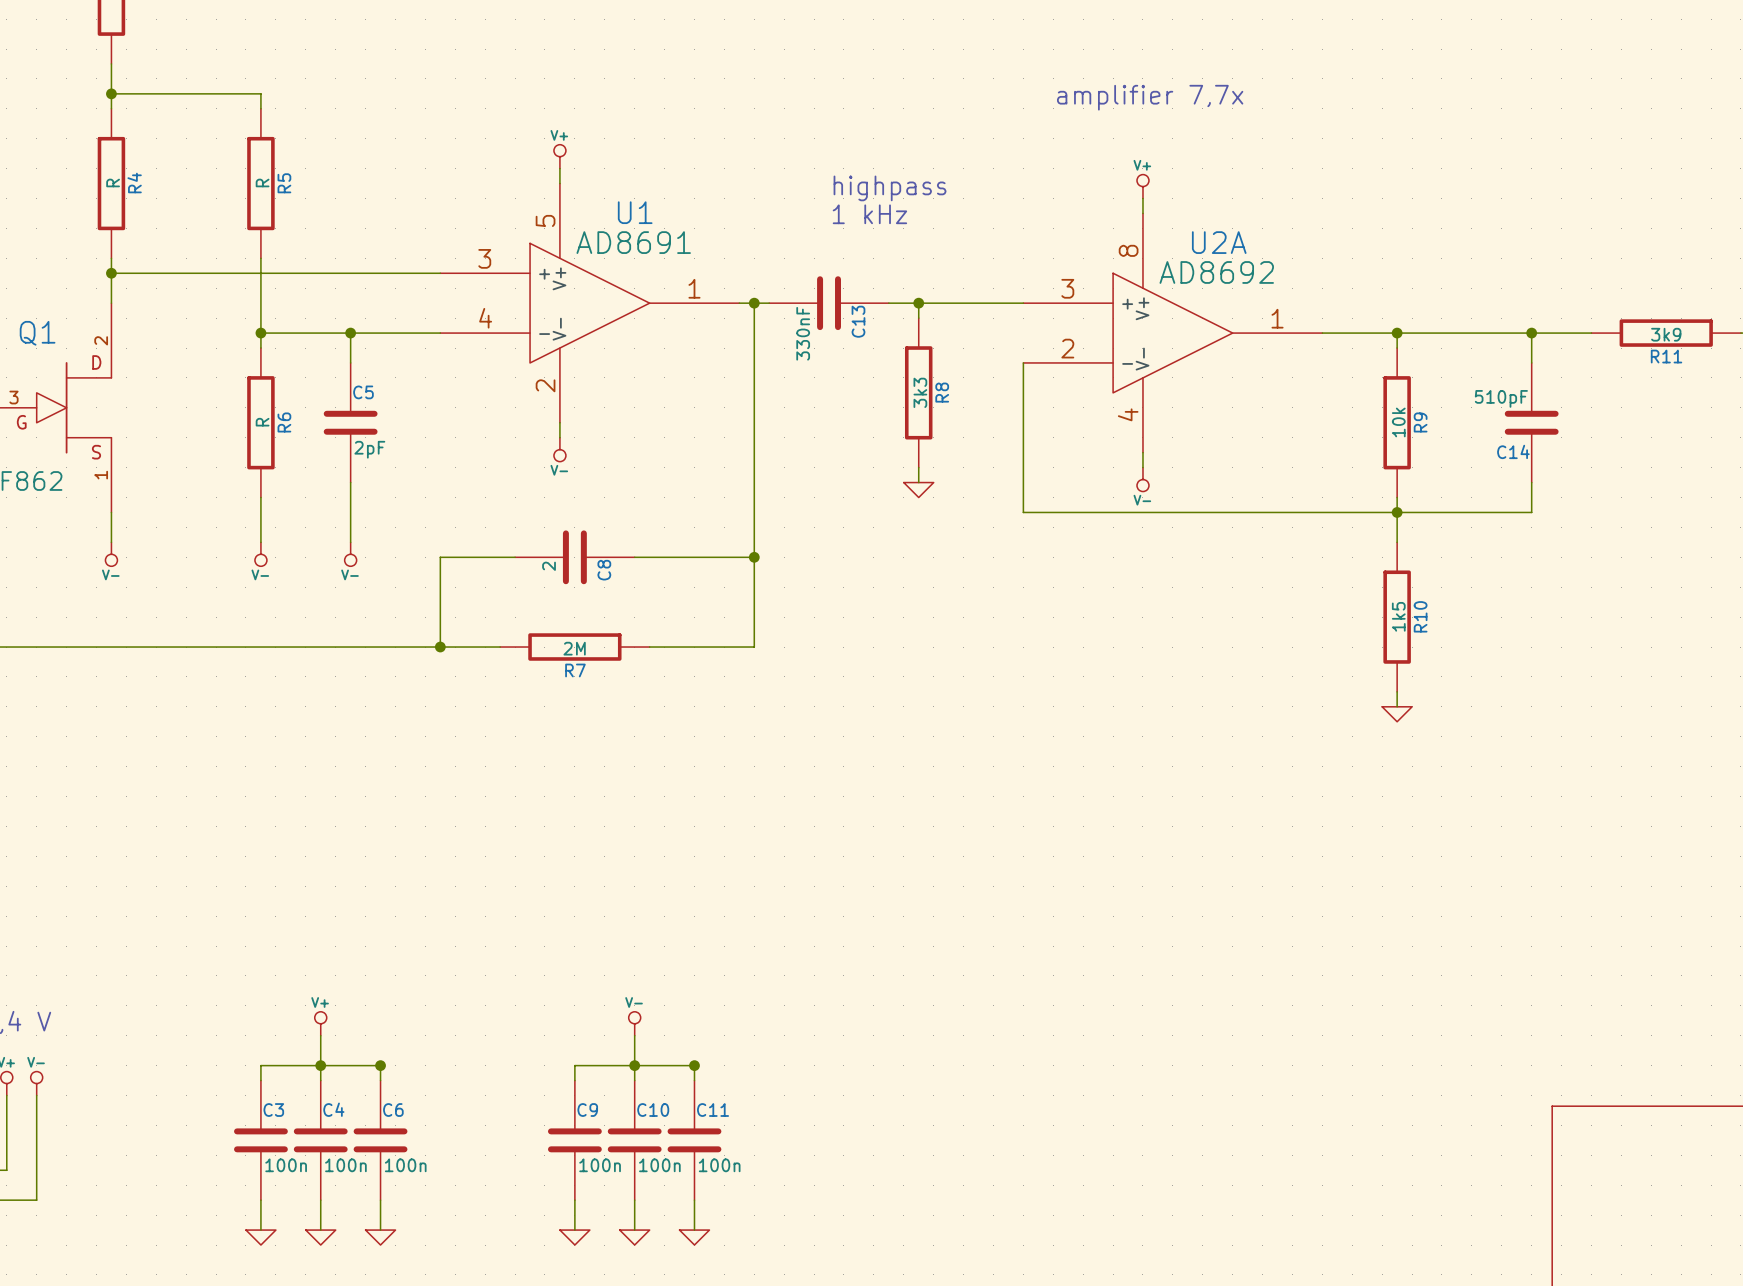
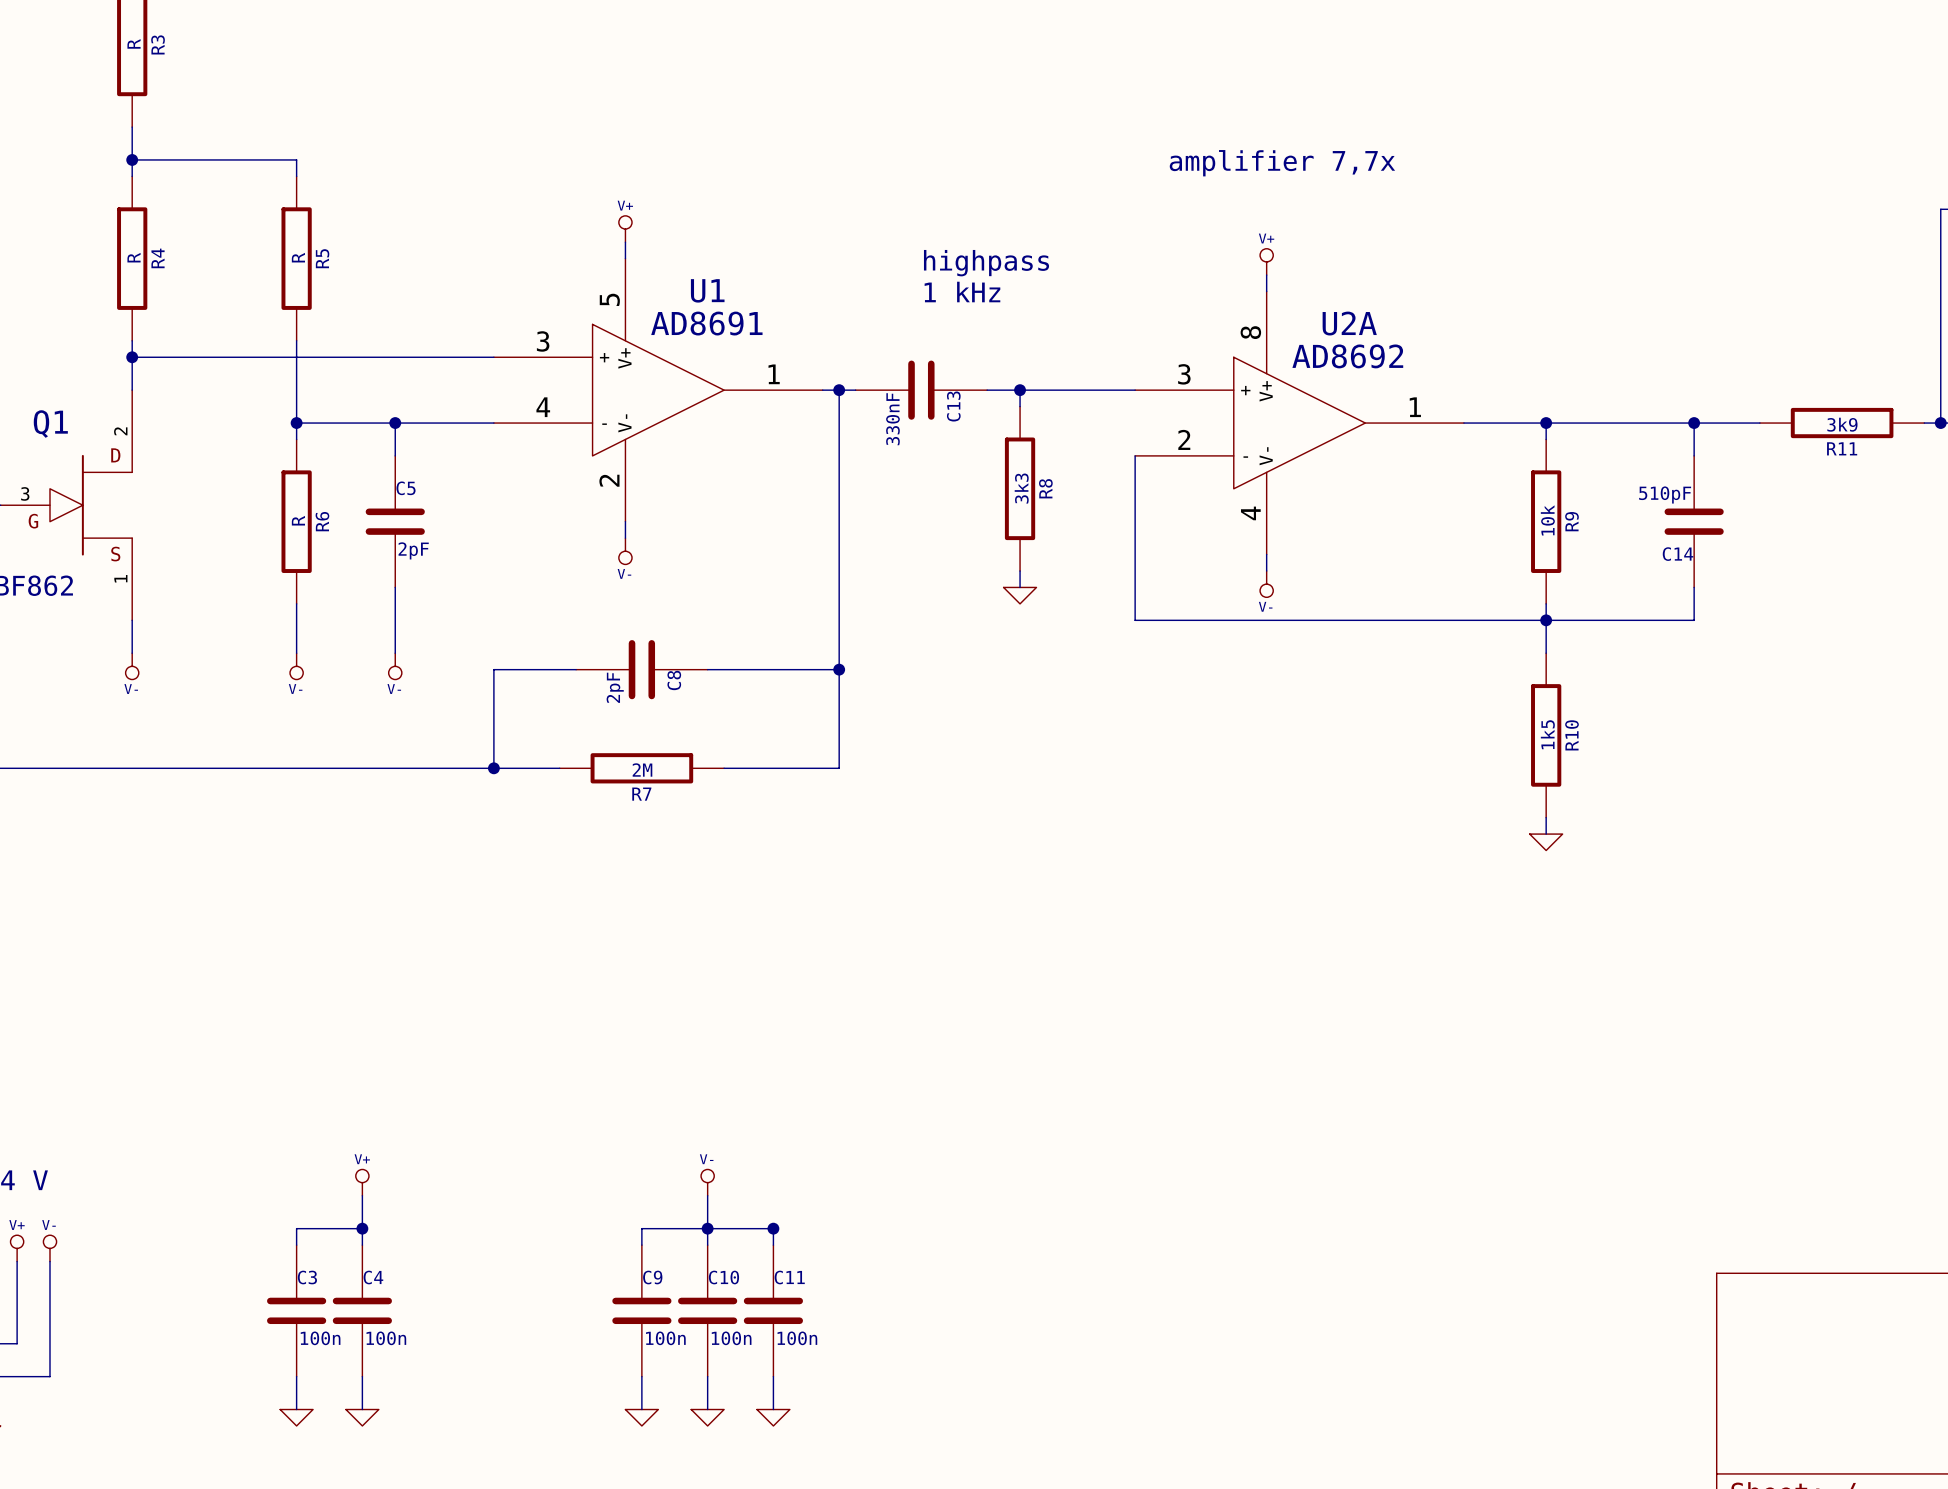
C8 value: 2 (549, 566) -> 2pF (615, 687)
wire: (320, 1065) (380, 1065) (380, 1080) -> none
junction: (380, 1065) -> none
C6: 100n (380, 1140) -> none
wire: (380, 1200) (380, 1230) -> none
power symbol: (380, 1237) -> none

